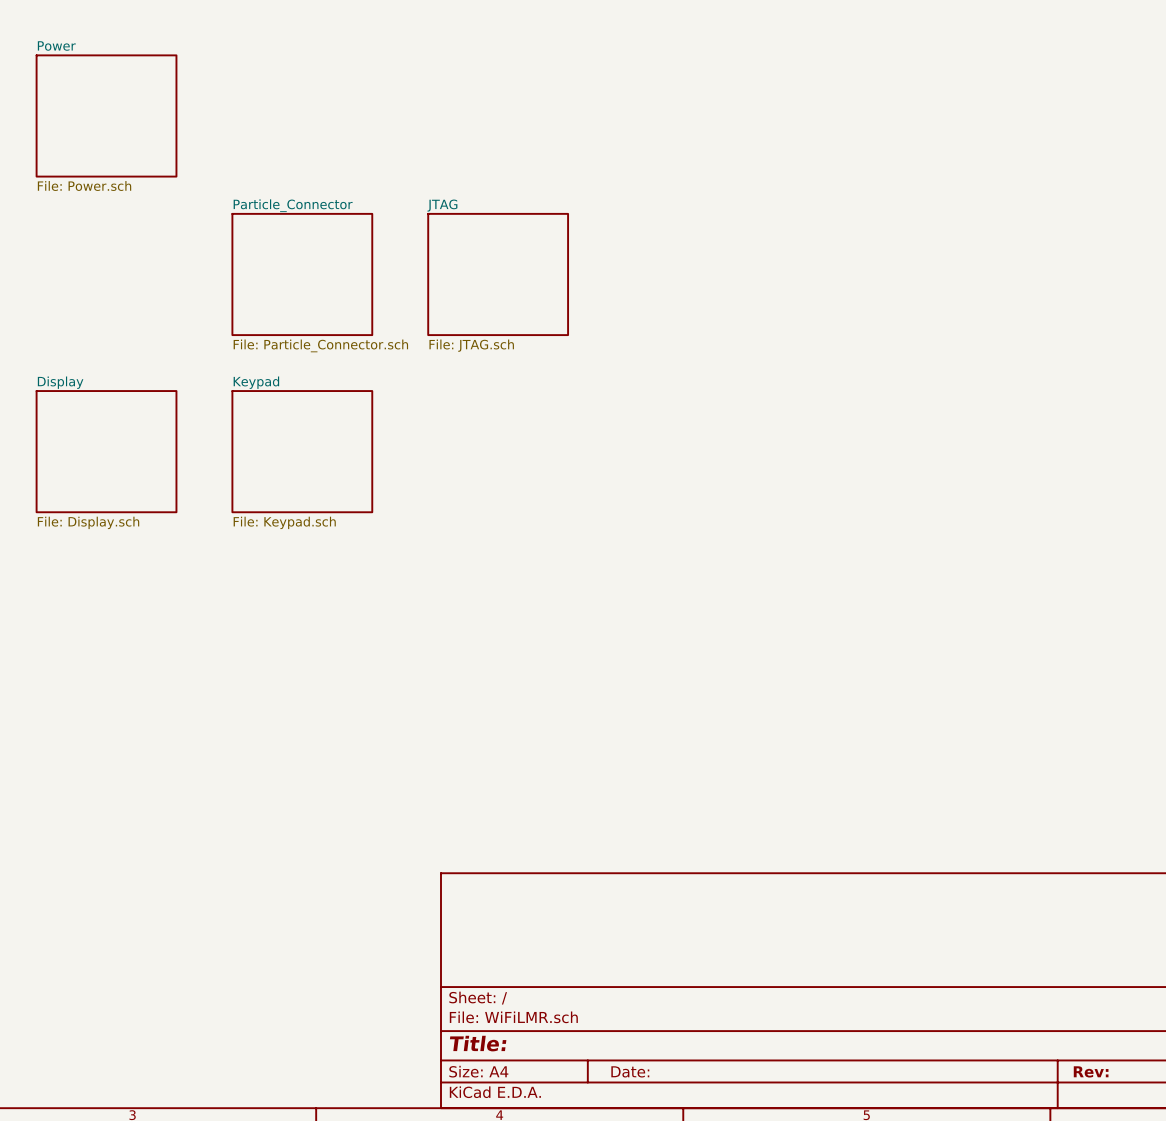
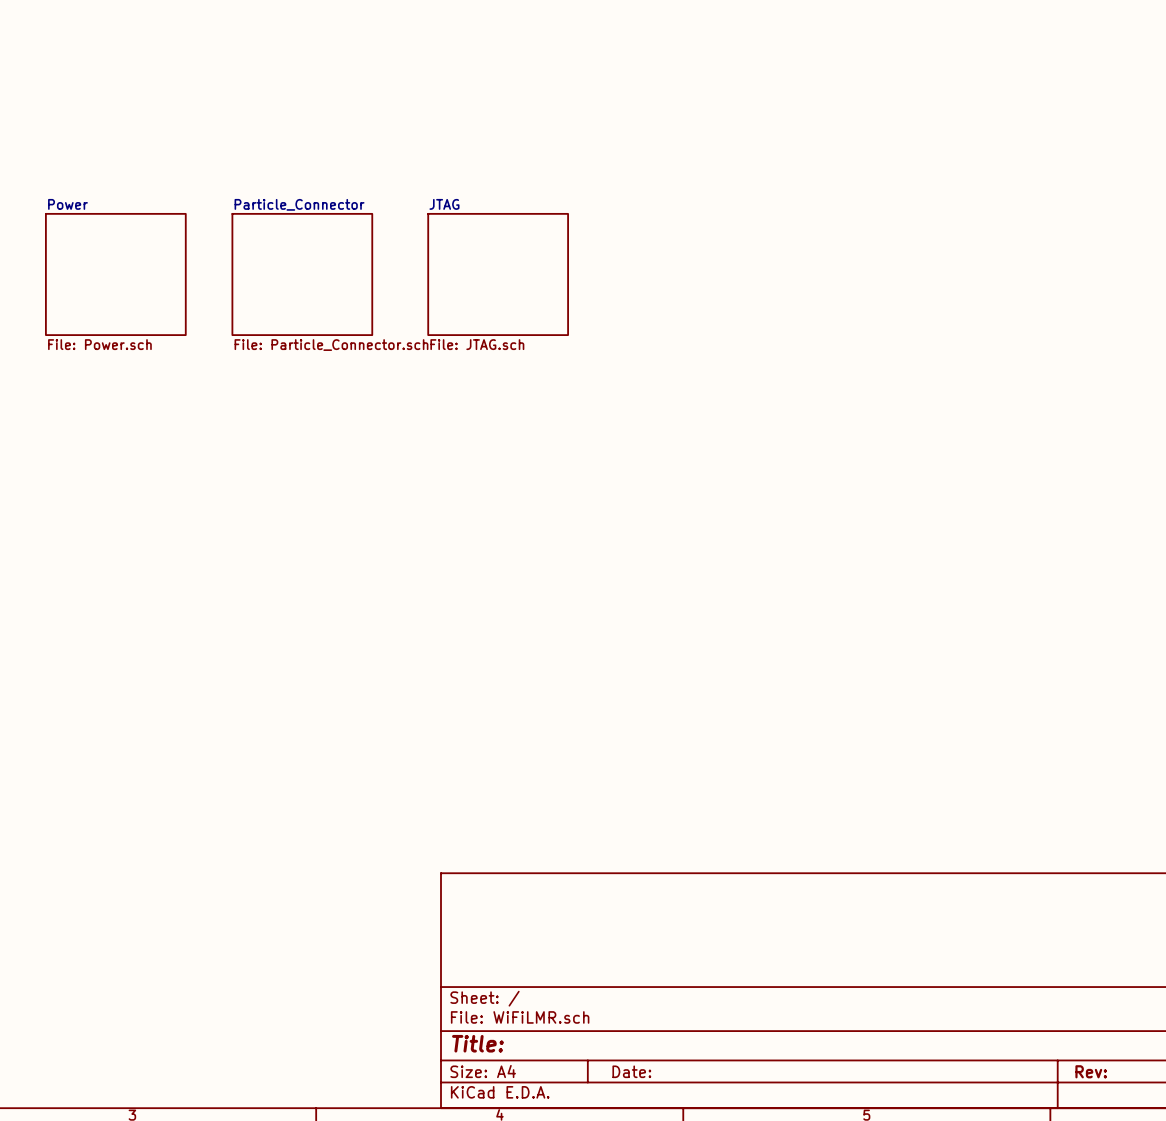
sheet Power position: (106, 115) -> (115, 274)
sheet Display: File: Display.sch (106, 451) -> none
sheet Keypad: File: Keypad.sch (302, 451) -> none

